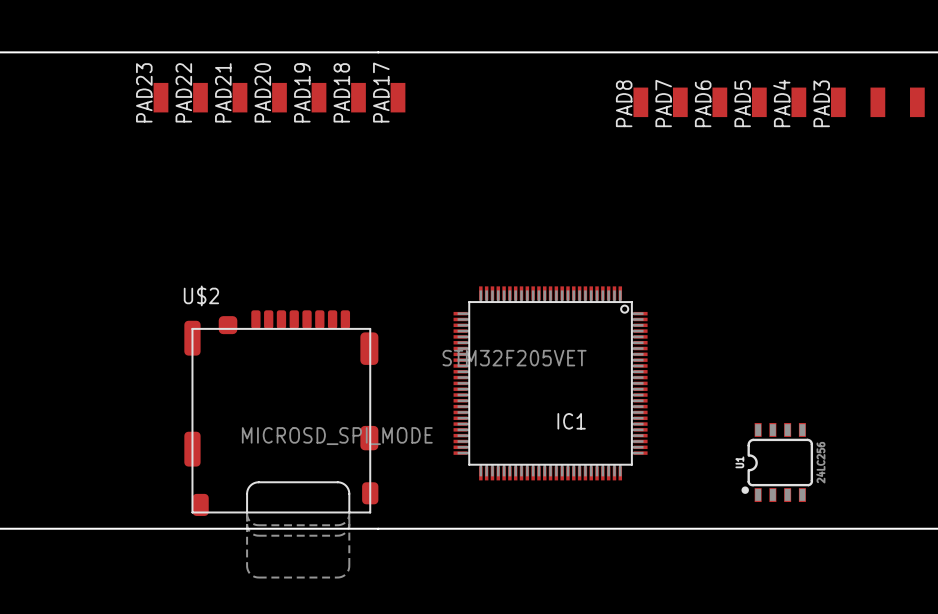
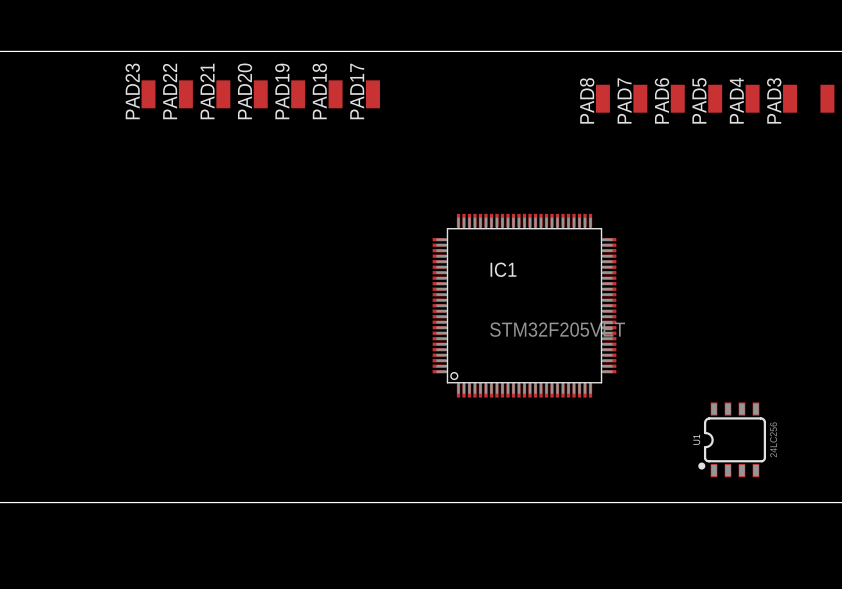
IC1 rotation: 0° (550, 383) -> 180° (524, 305)
U$2: MICROSD_SPI_MODE (281, 444) -> none

